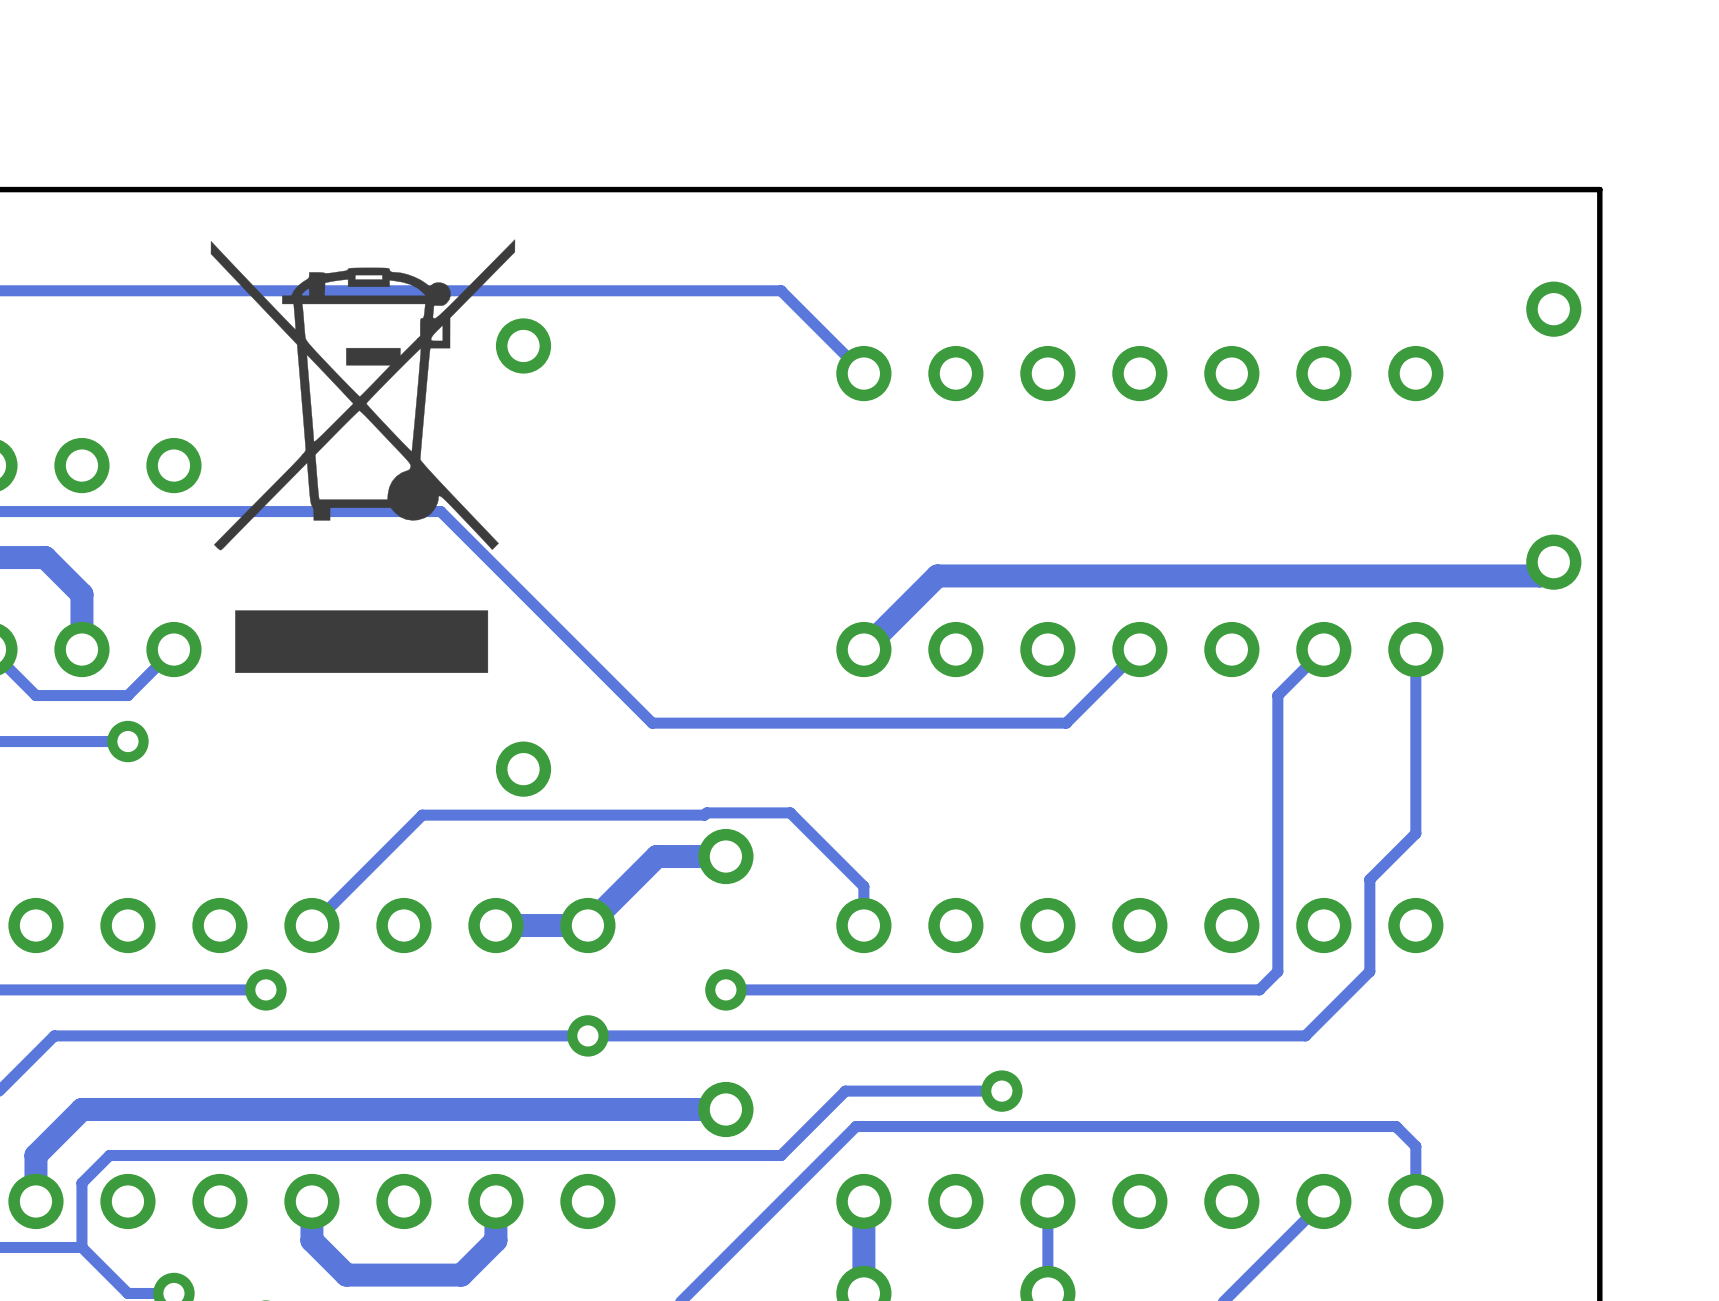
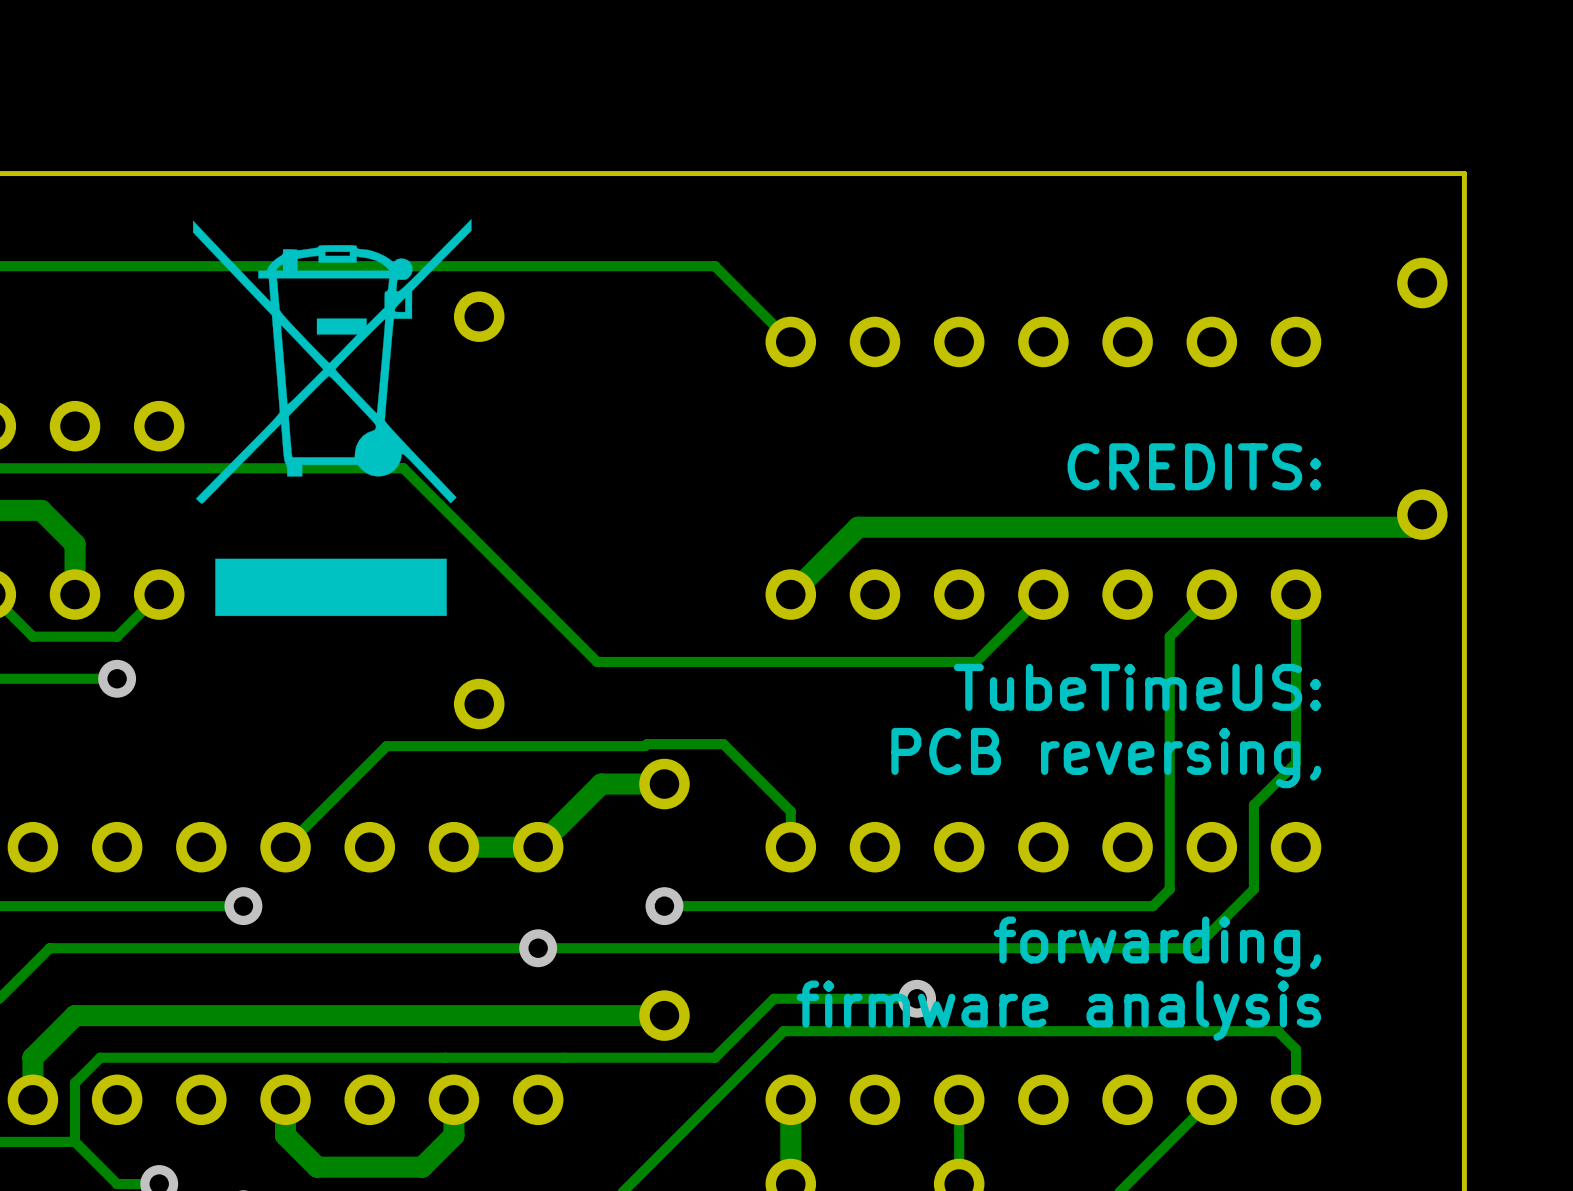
text: none -> CREDITS: (1194, 466)
text: none -> TubeTimeUS: (1137, 687)
text: none -> PCB reversing, (1106, 758)
text: none -> forwarding, (1157, 946)
text: none -> firmware analysis (1058, 1010)

